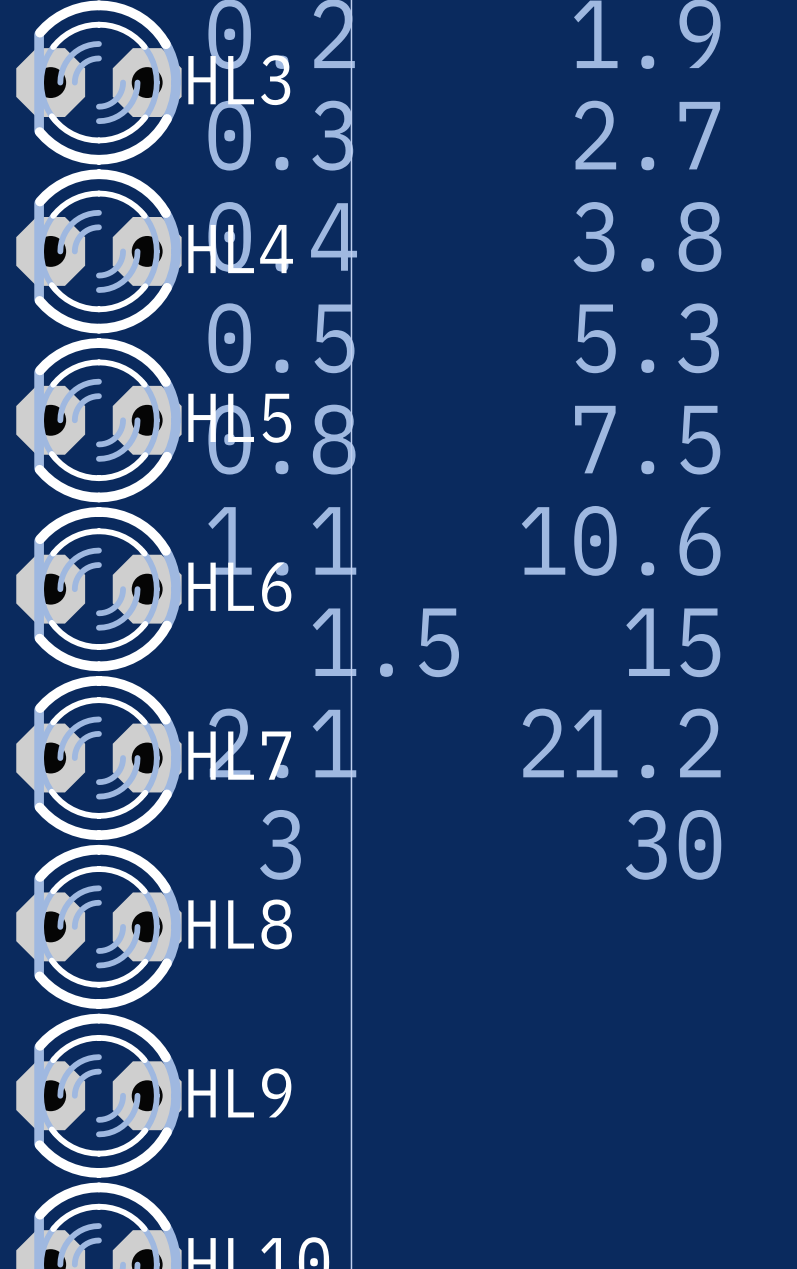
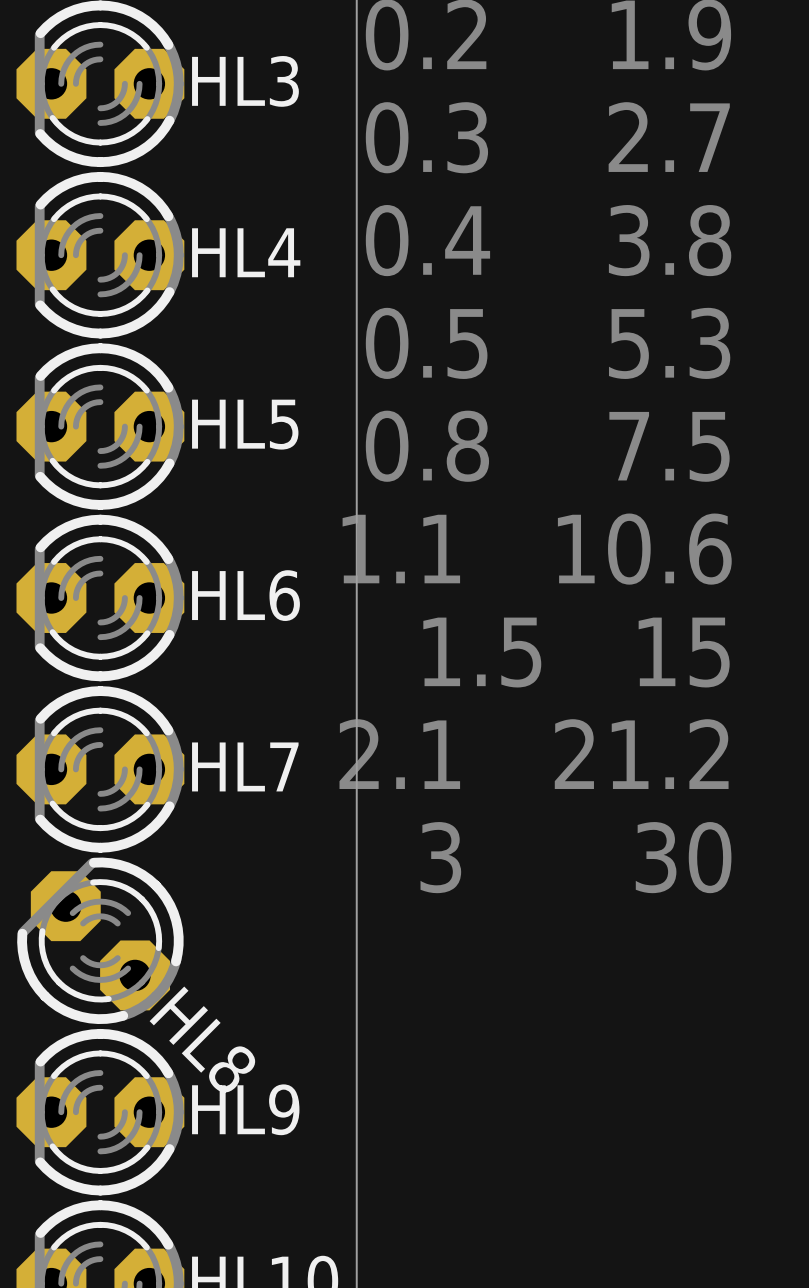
HL8 rotation: 0° (98, 926) -> 45° clockwise (100, 940)

